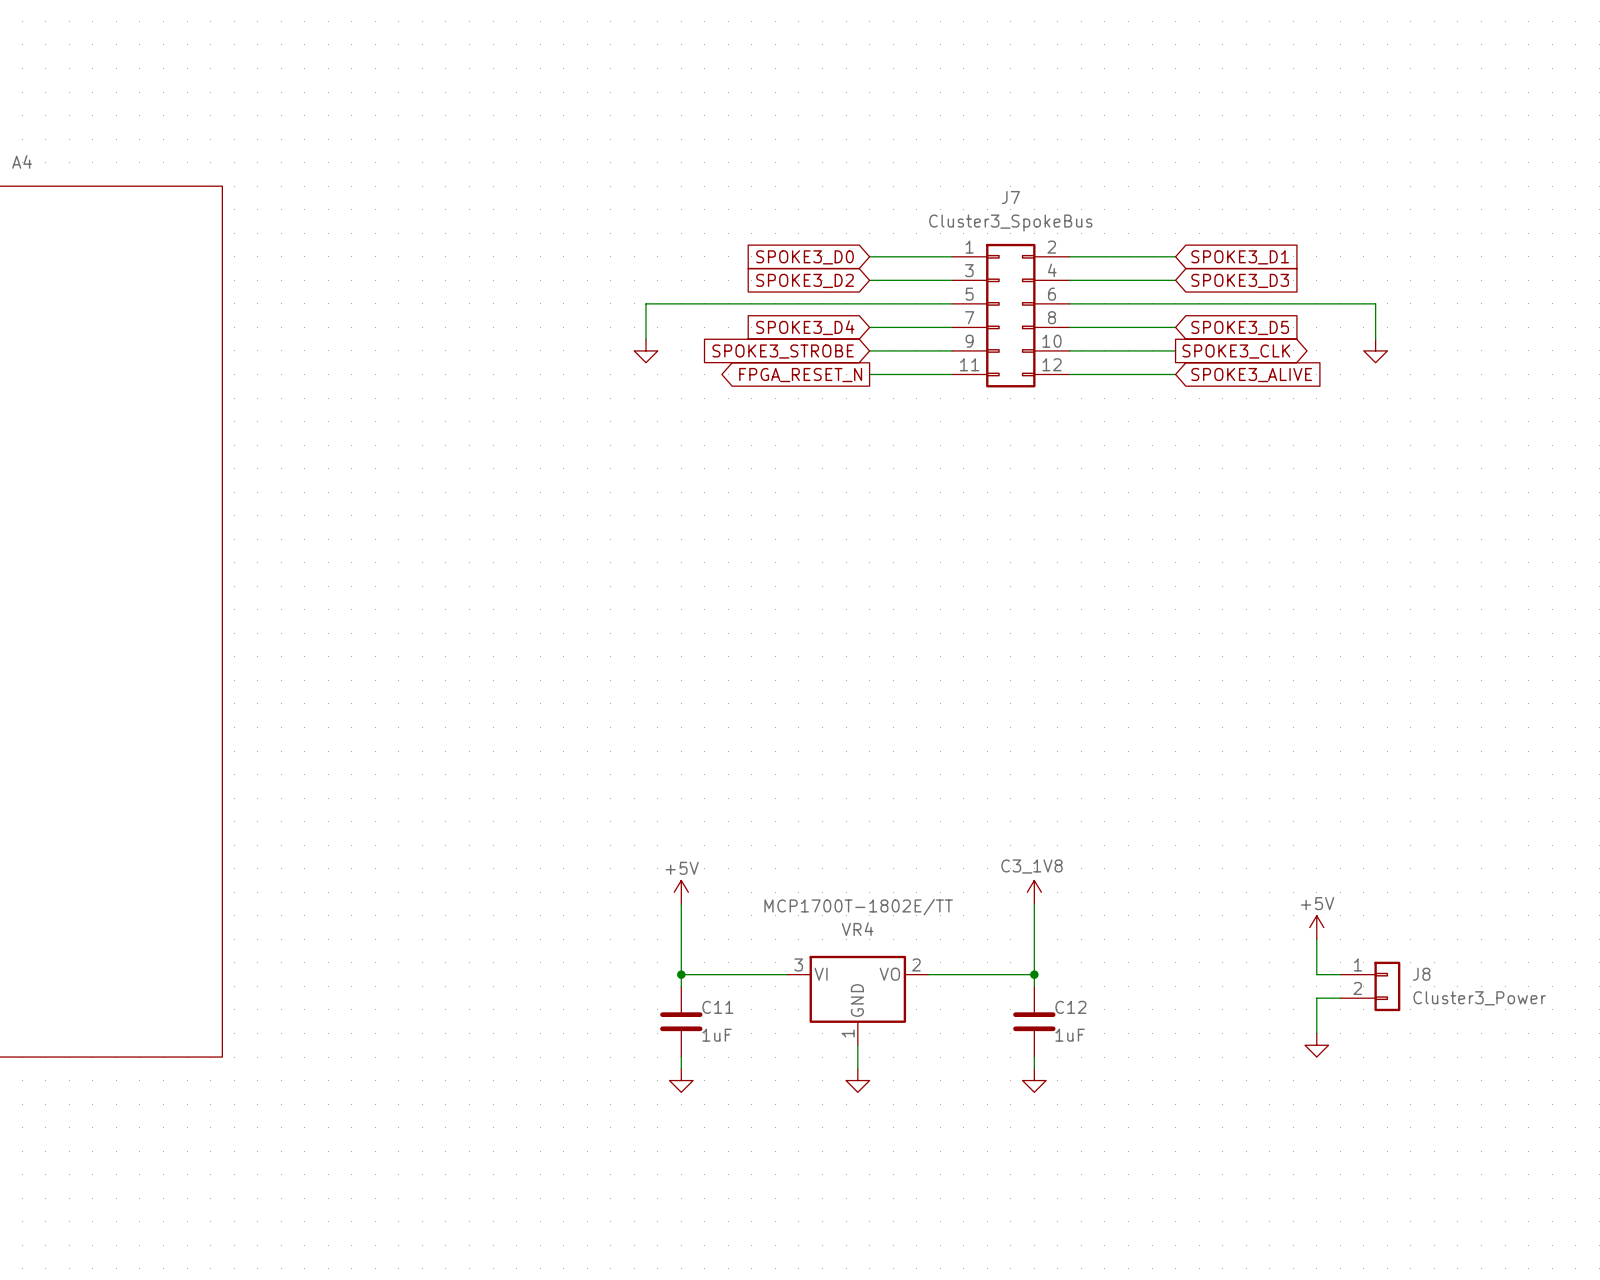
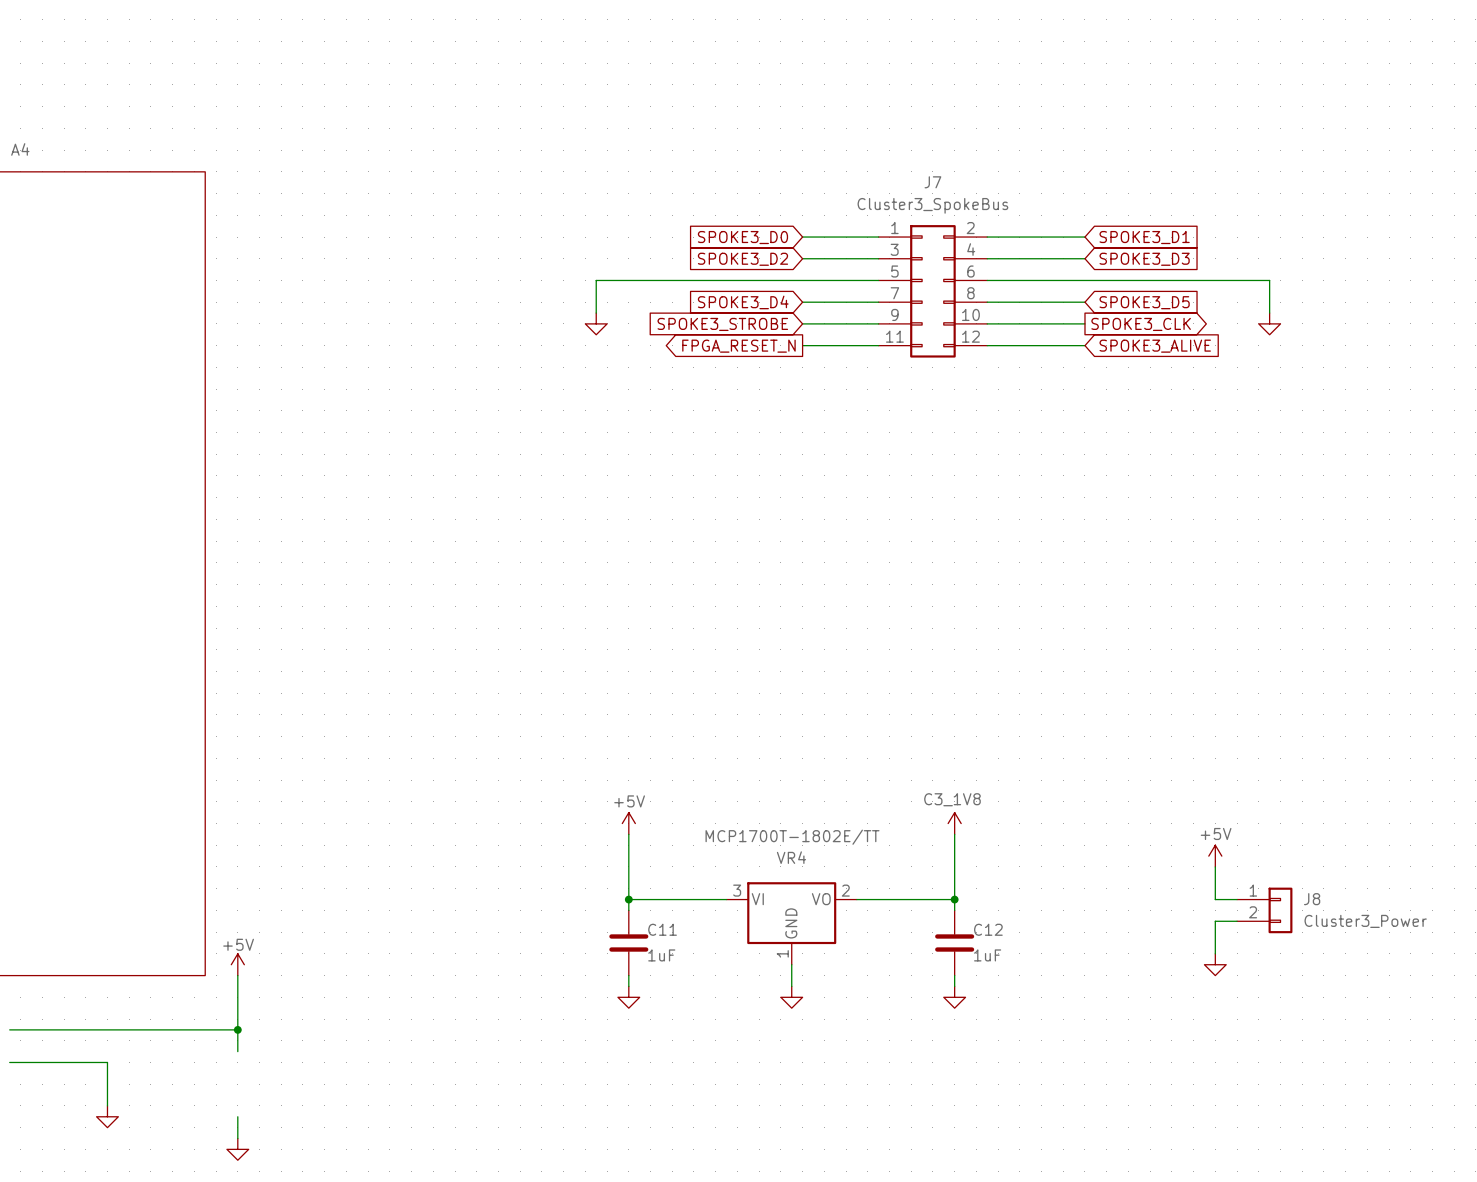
power symbol: none -> +5V (237, 964)
wire: none -> (237, 975) (237, 1051)
wire: none -> (9, 1029) (237, 1029)
junction: none -> (237, 1029)
wire: none -> (9, 1062) (107, 1062) (107, 1105)
power symbol: none -> (107, 1116)
wire: none -> (237, 1116) (237, 1138)
power symbol: none -> (237, 1149)

